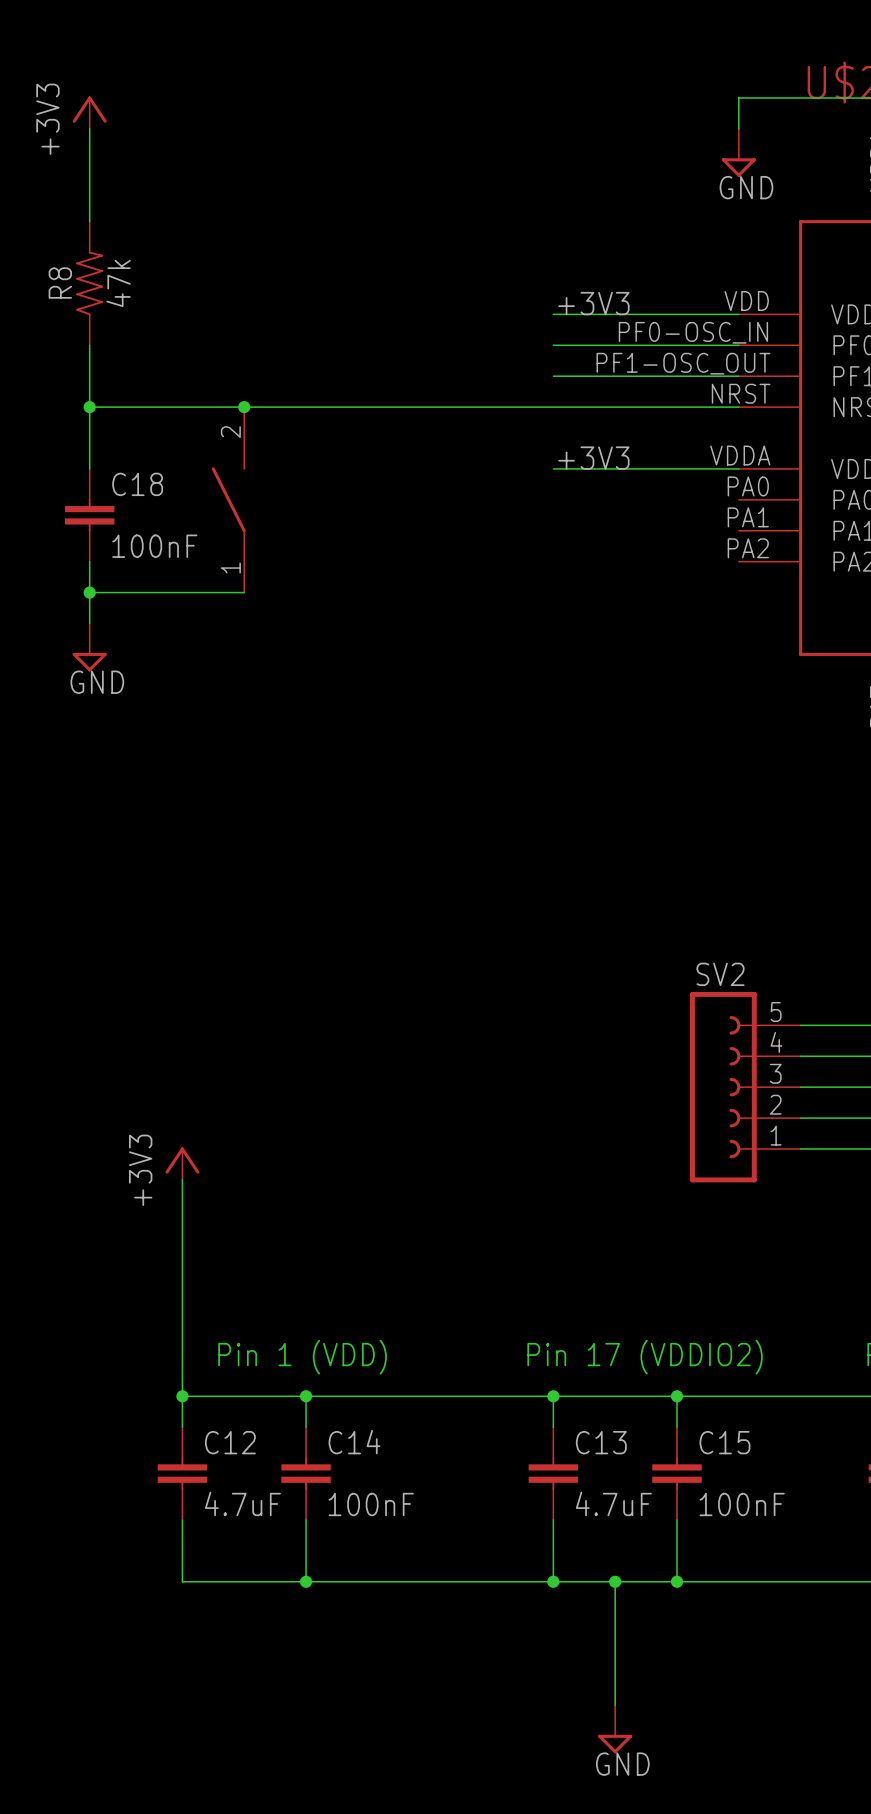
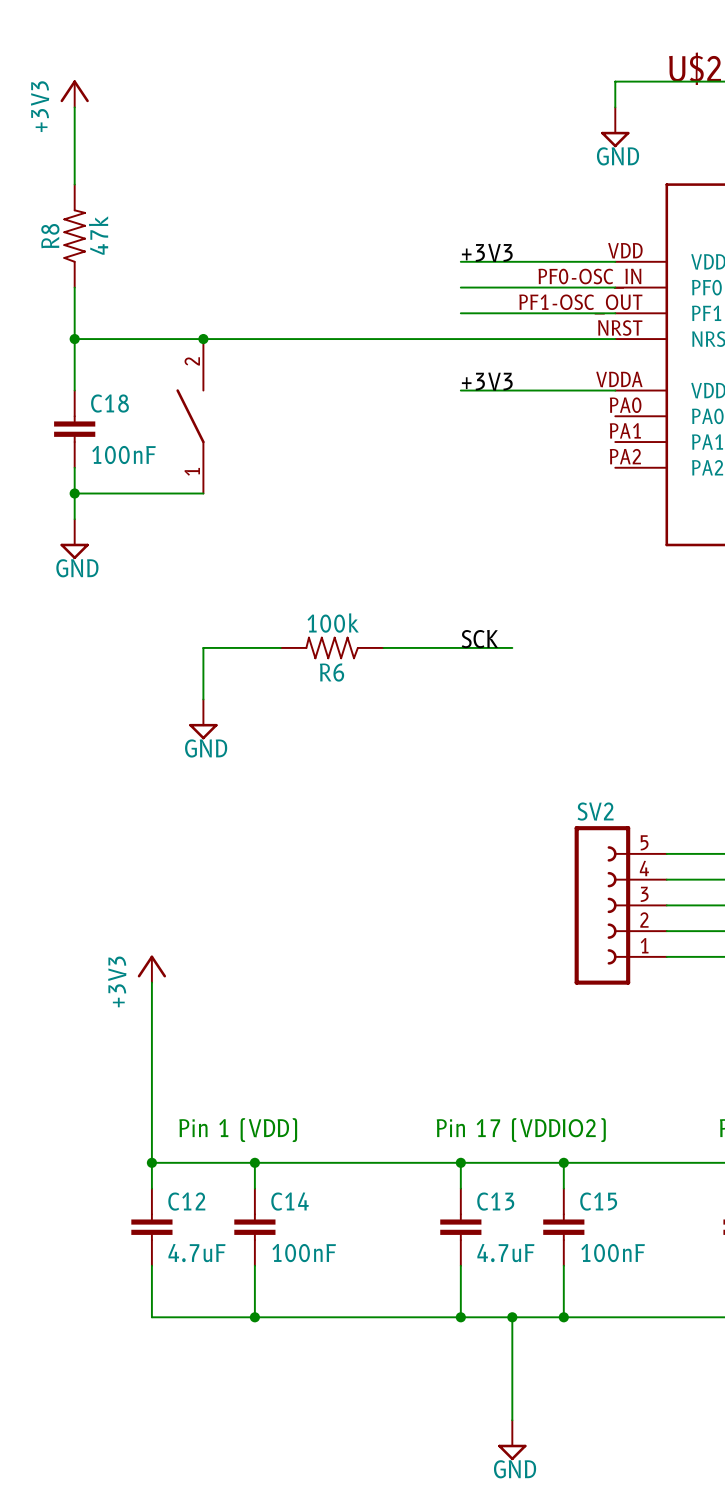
label: none -> SCK (479, 639)
wire: none -> (280, 647) (203, 647) (203, 699)
R6: none -> 100k (332, 647)
wire: none -> (383, 647) (512, 647)
power symbol: none -> GND (203, 719)

